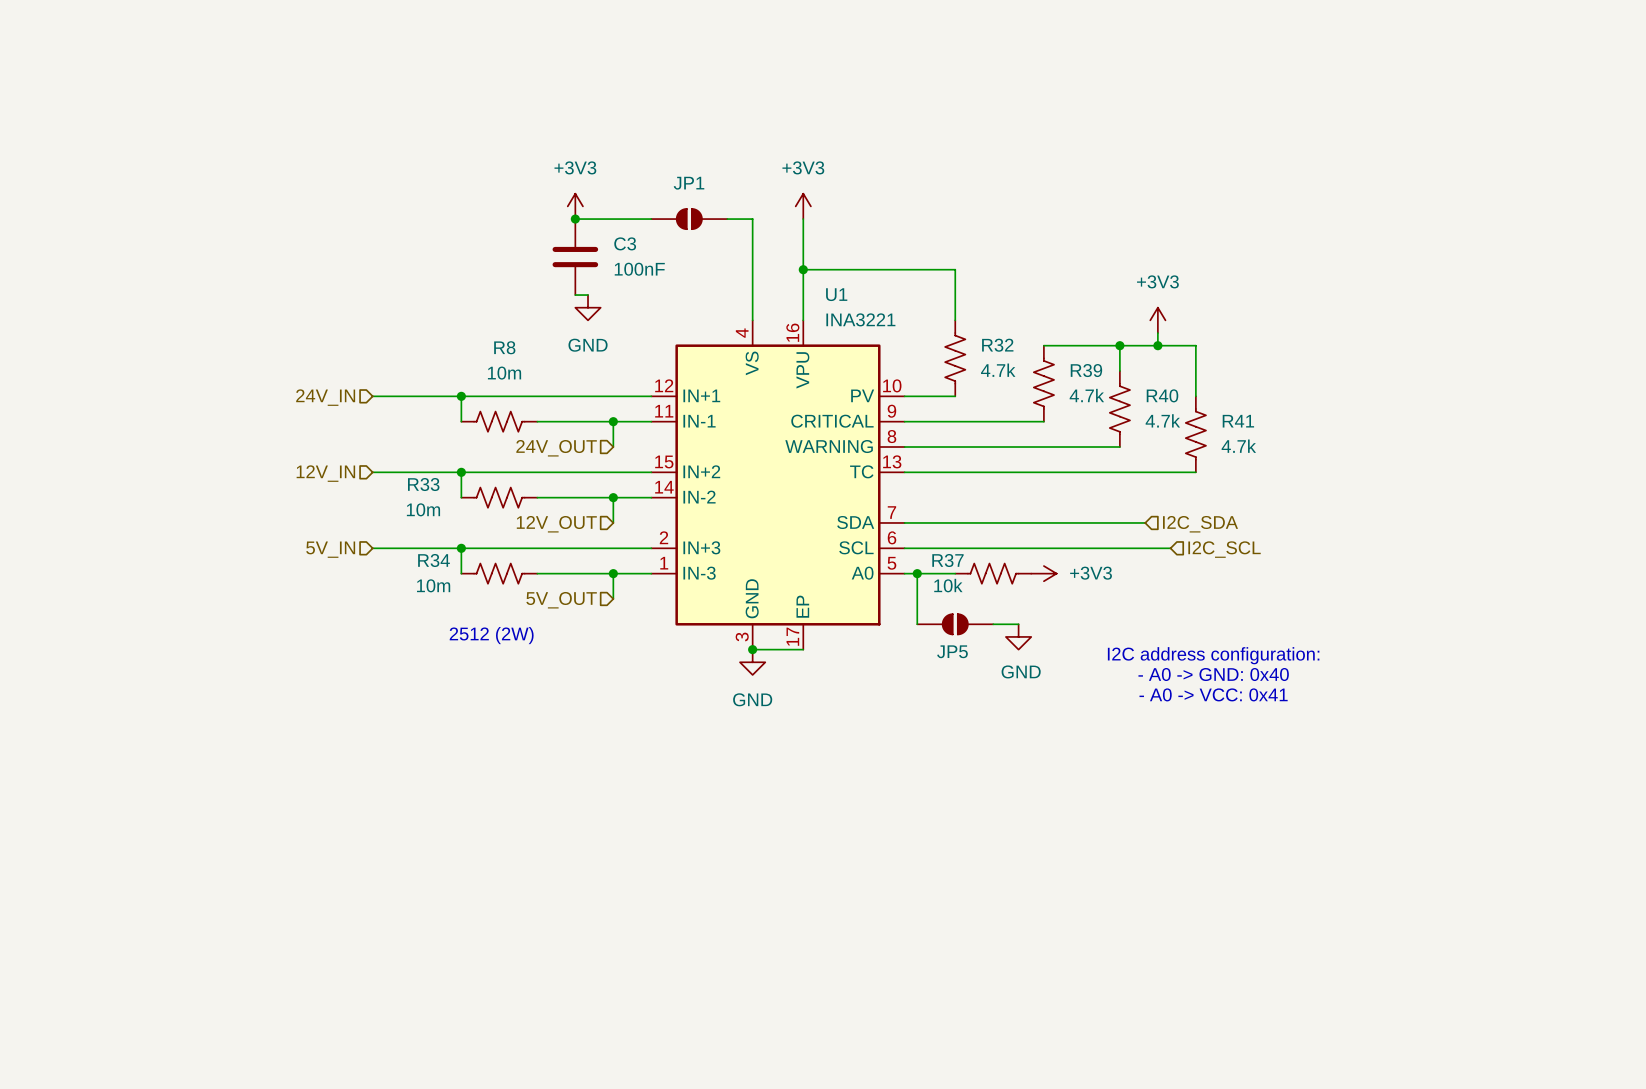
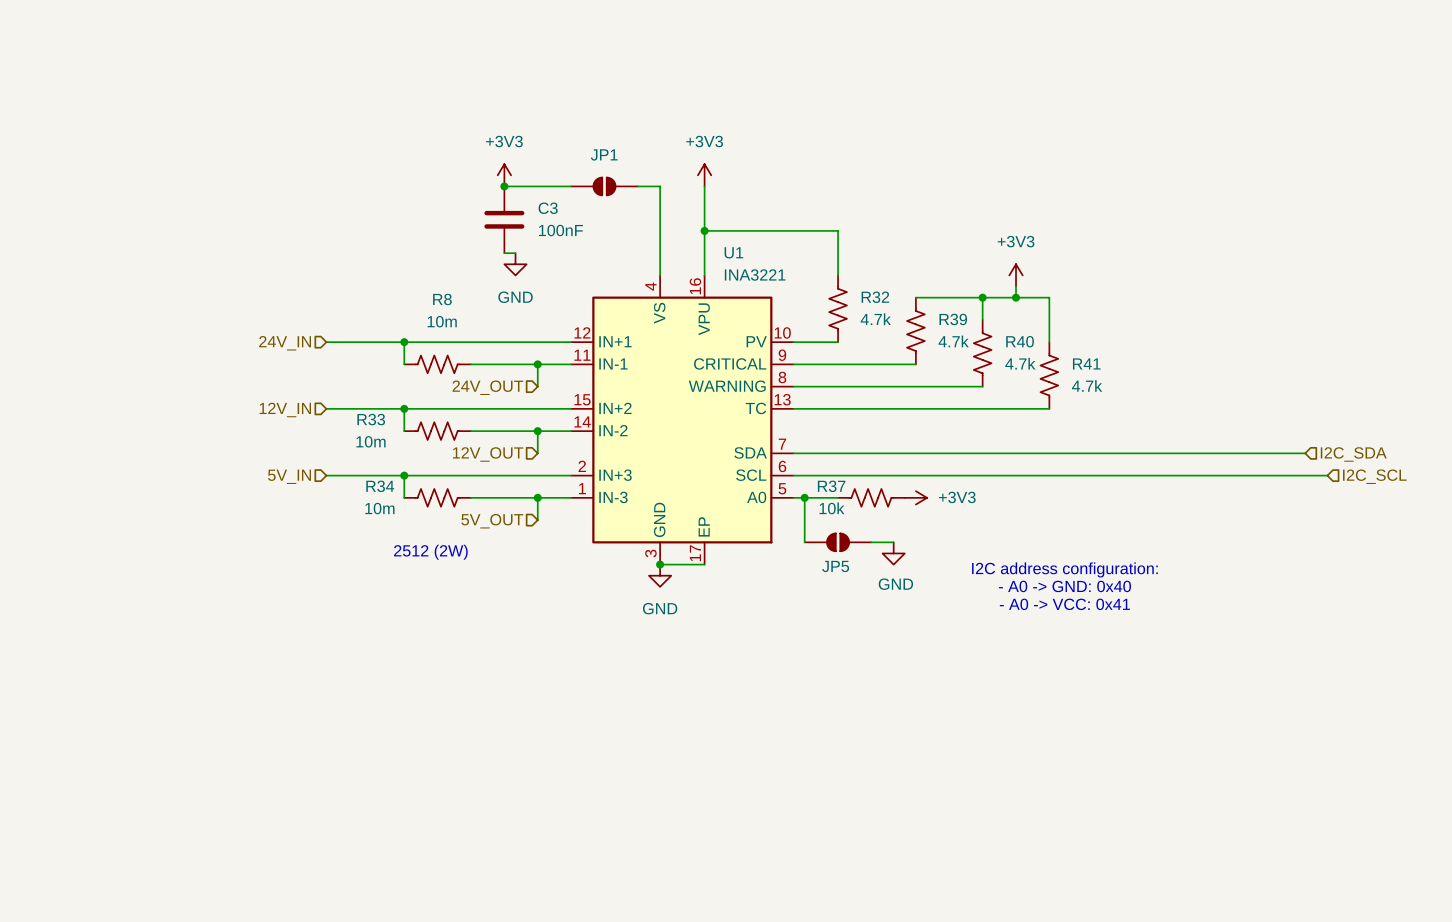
wire: none -> (1004, 453) (1305, 453)
hierarchical label: I2C_SDA (1200, 524) -> none
hierarchical label: none -> I2C_SDA (1353, 454)
wire: none -> (1027, 475) (1327, 475)
hierarchical label: I2C_SCL (1224, 549) -> none
hierarchical label: none -> I2C_SCL (1374, 476)

